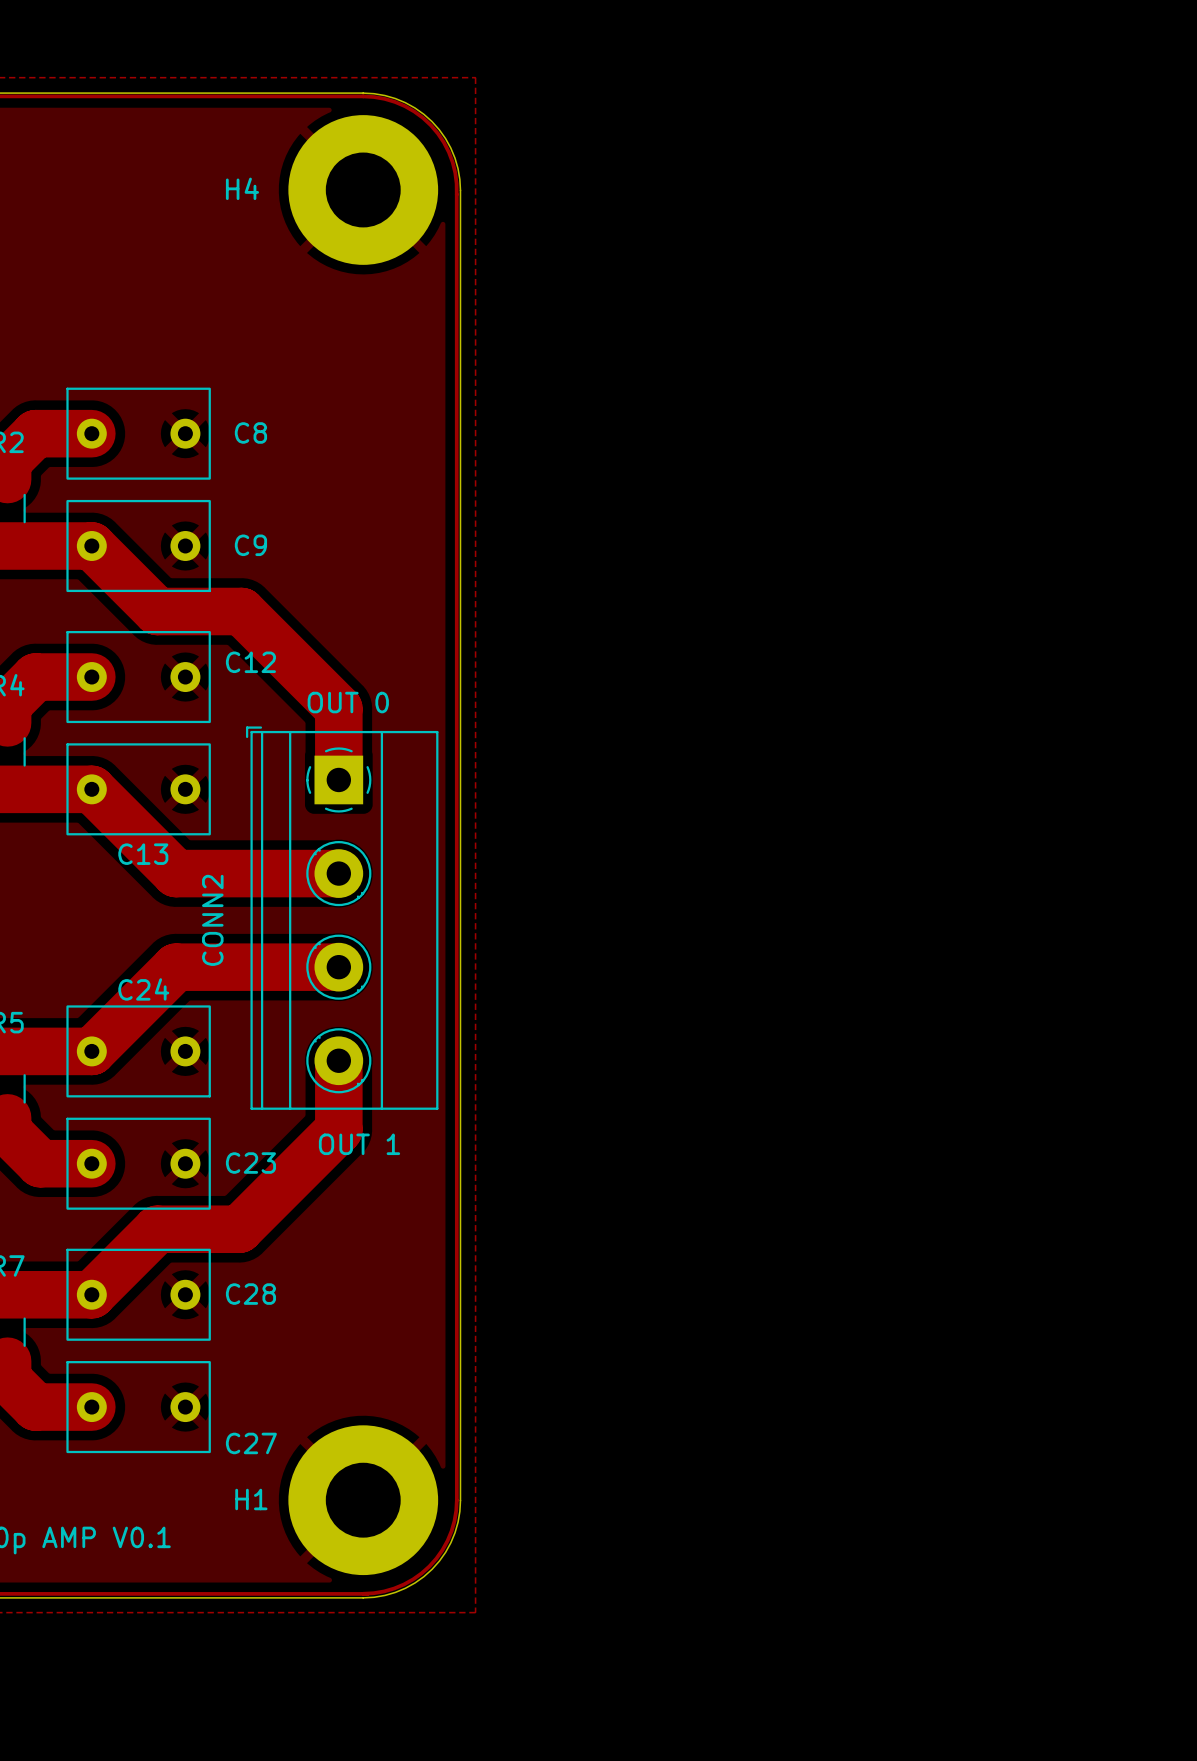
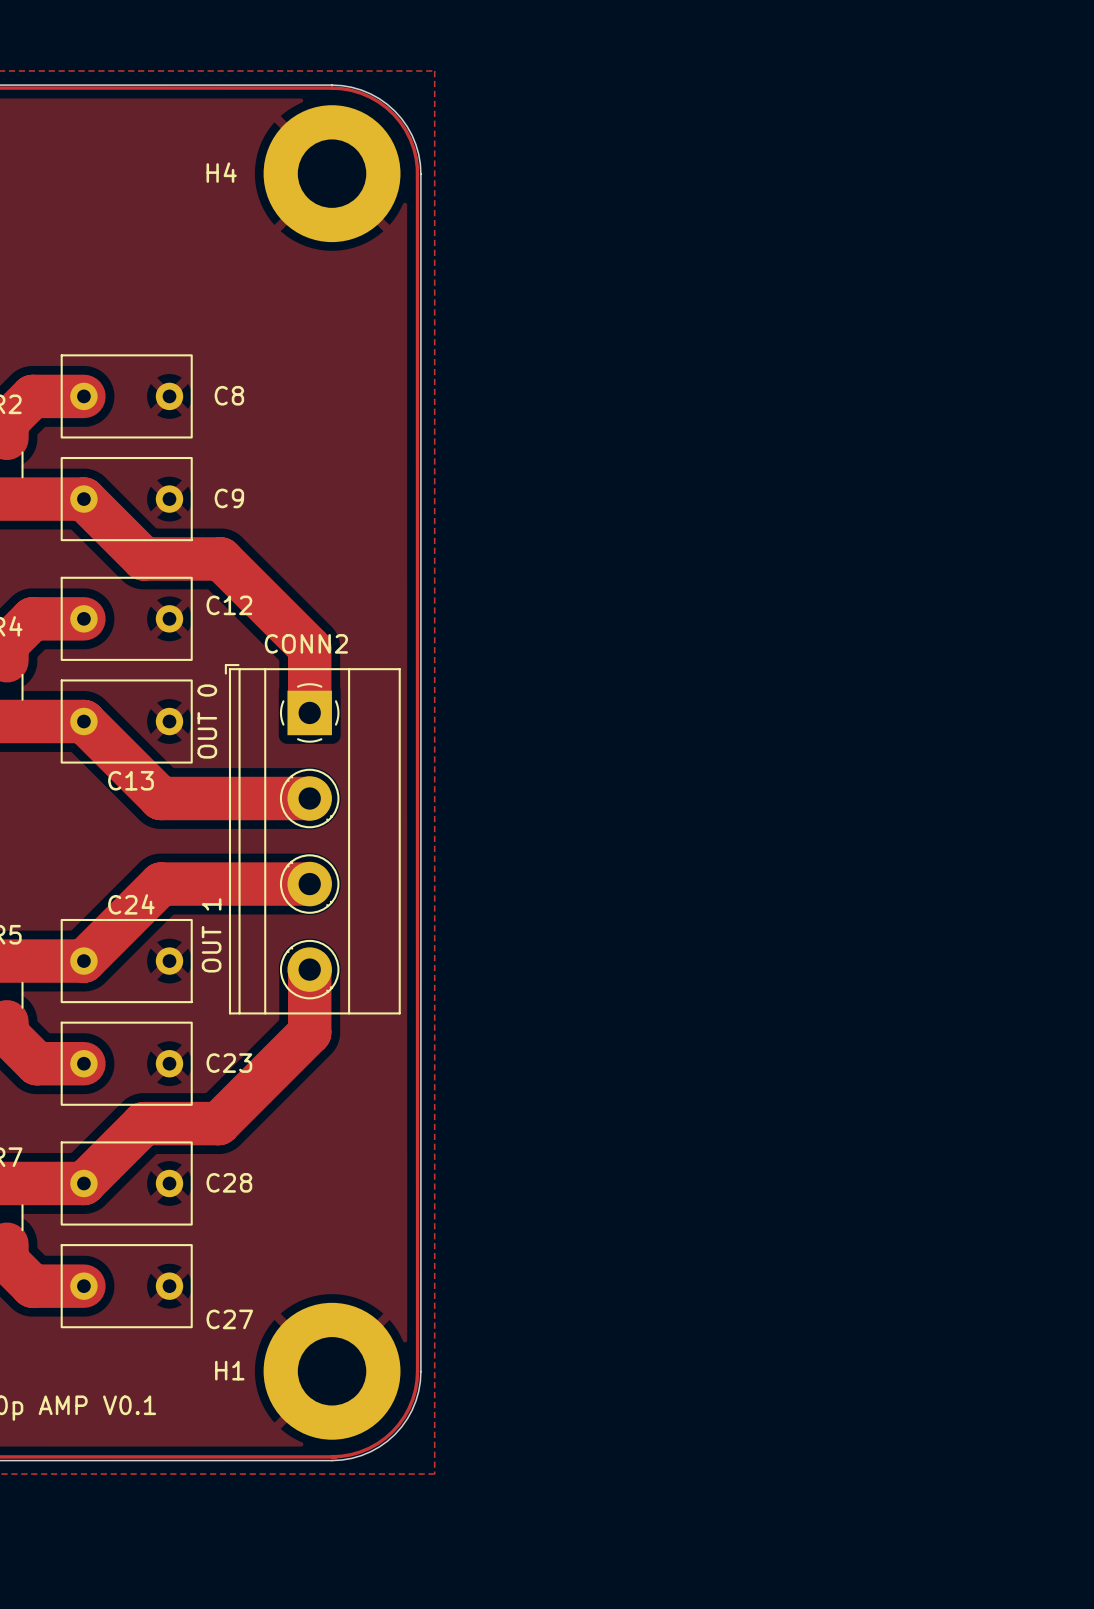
text rotation: 0° (348, 702) -> 90° counterclockwise (207, 721)
text position: OUT 0 (348, 702) -> OUT 0 (207, 721)
CONN2 name rotation: 0° (212, 920) -> 90° clockwise (306, 643)
CONN2 name position: CONN2 (212, 920) -> CONN2 (306, 643)
text rotation: 0° (359, 1144) -> 90° counterclockwise (211, 935)
text position: OUT 1 (359, 1144) -> OUT 1 (211, 935)

